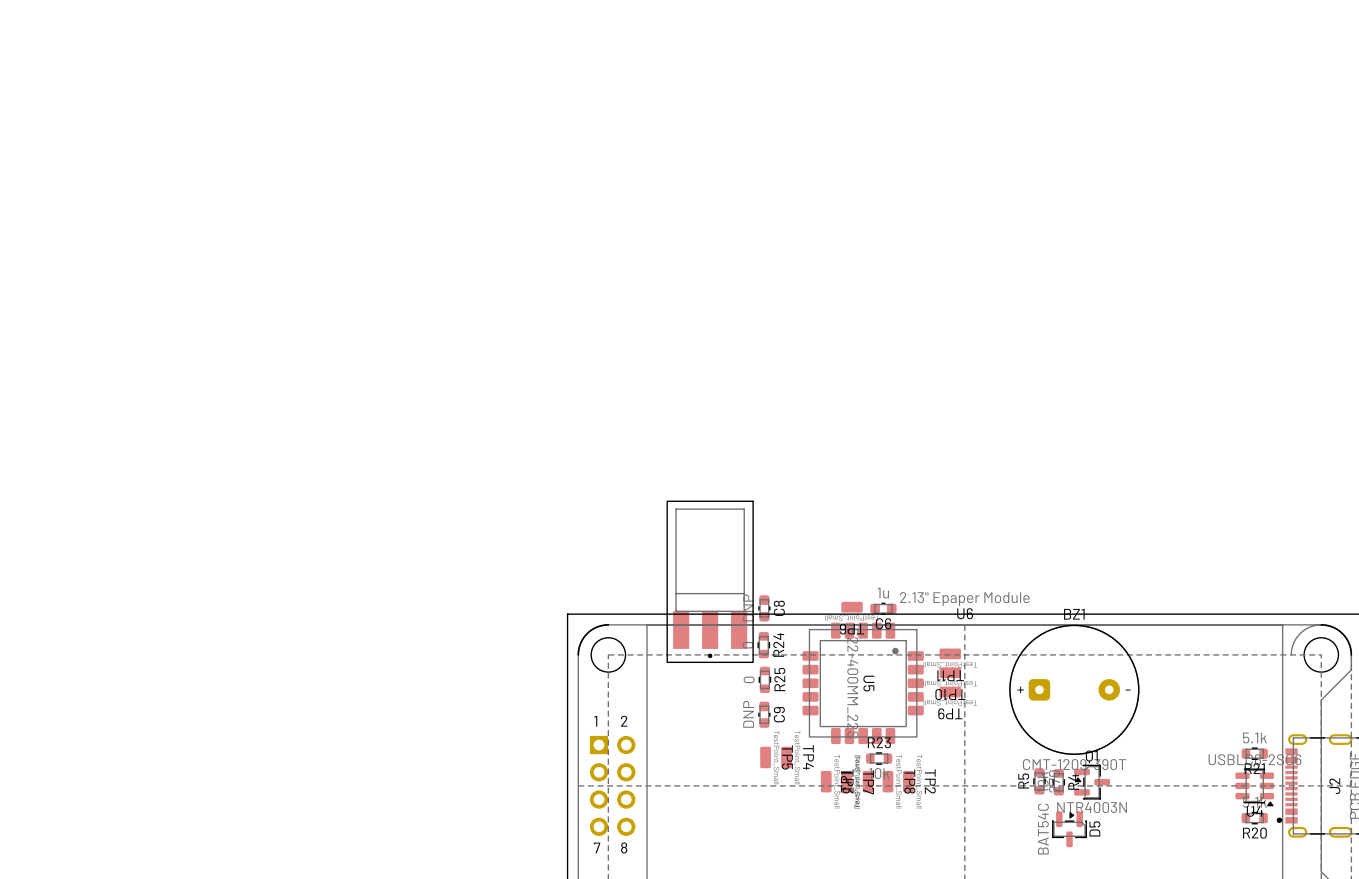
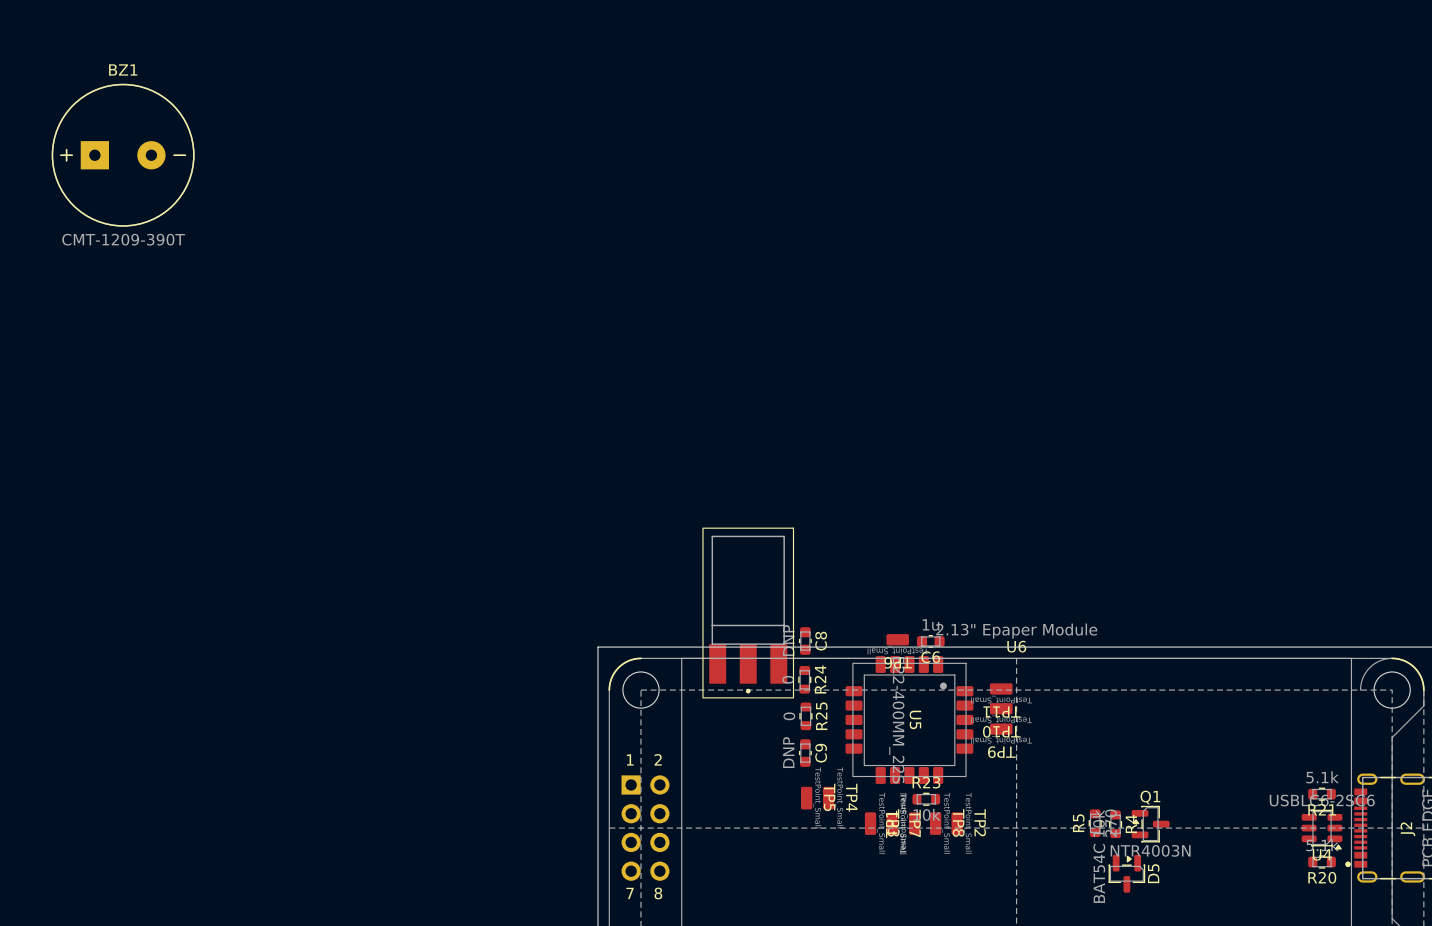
BZ1 footprint: [1009, 624, 1140, 755] -> [51, 83, 195, 227]

